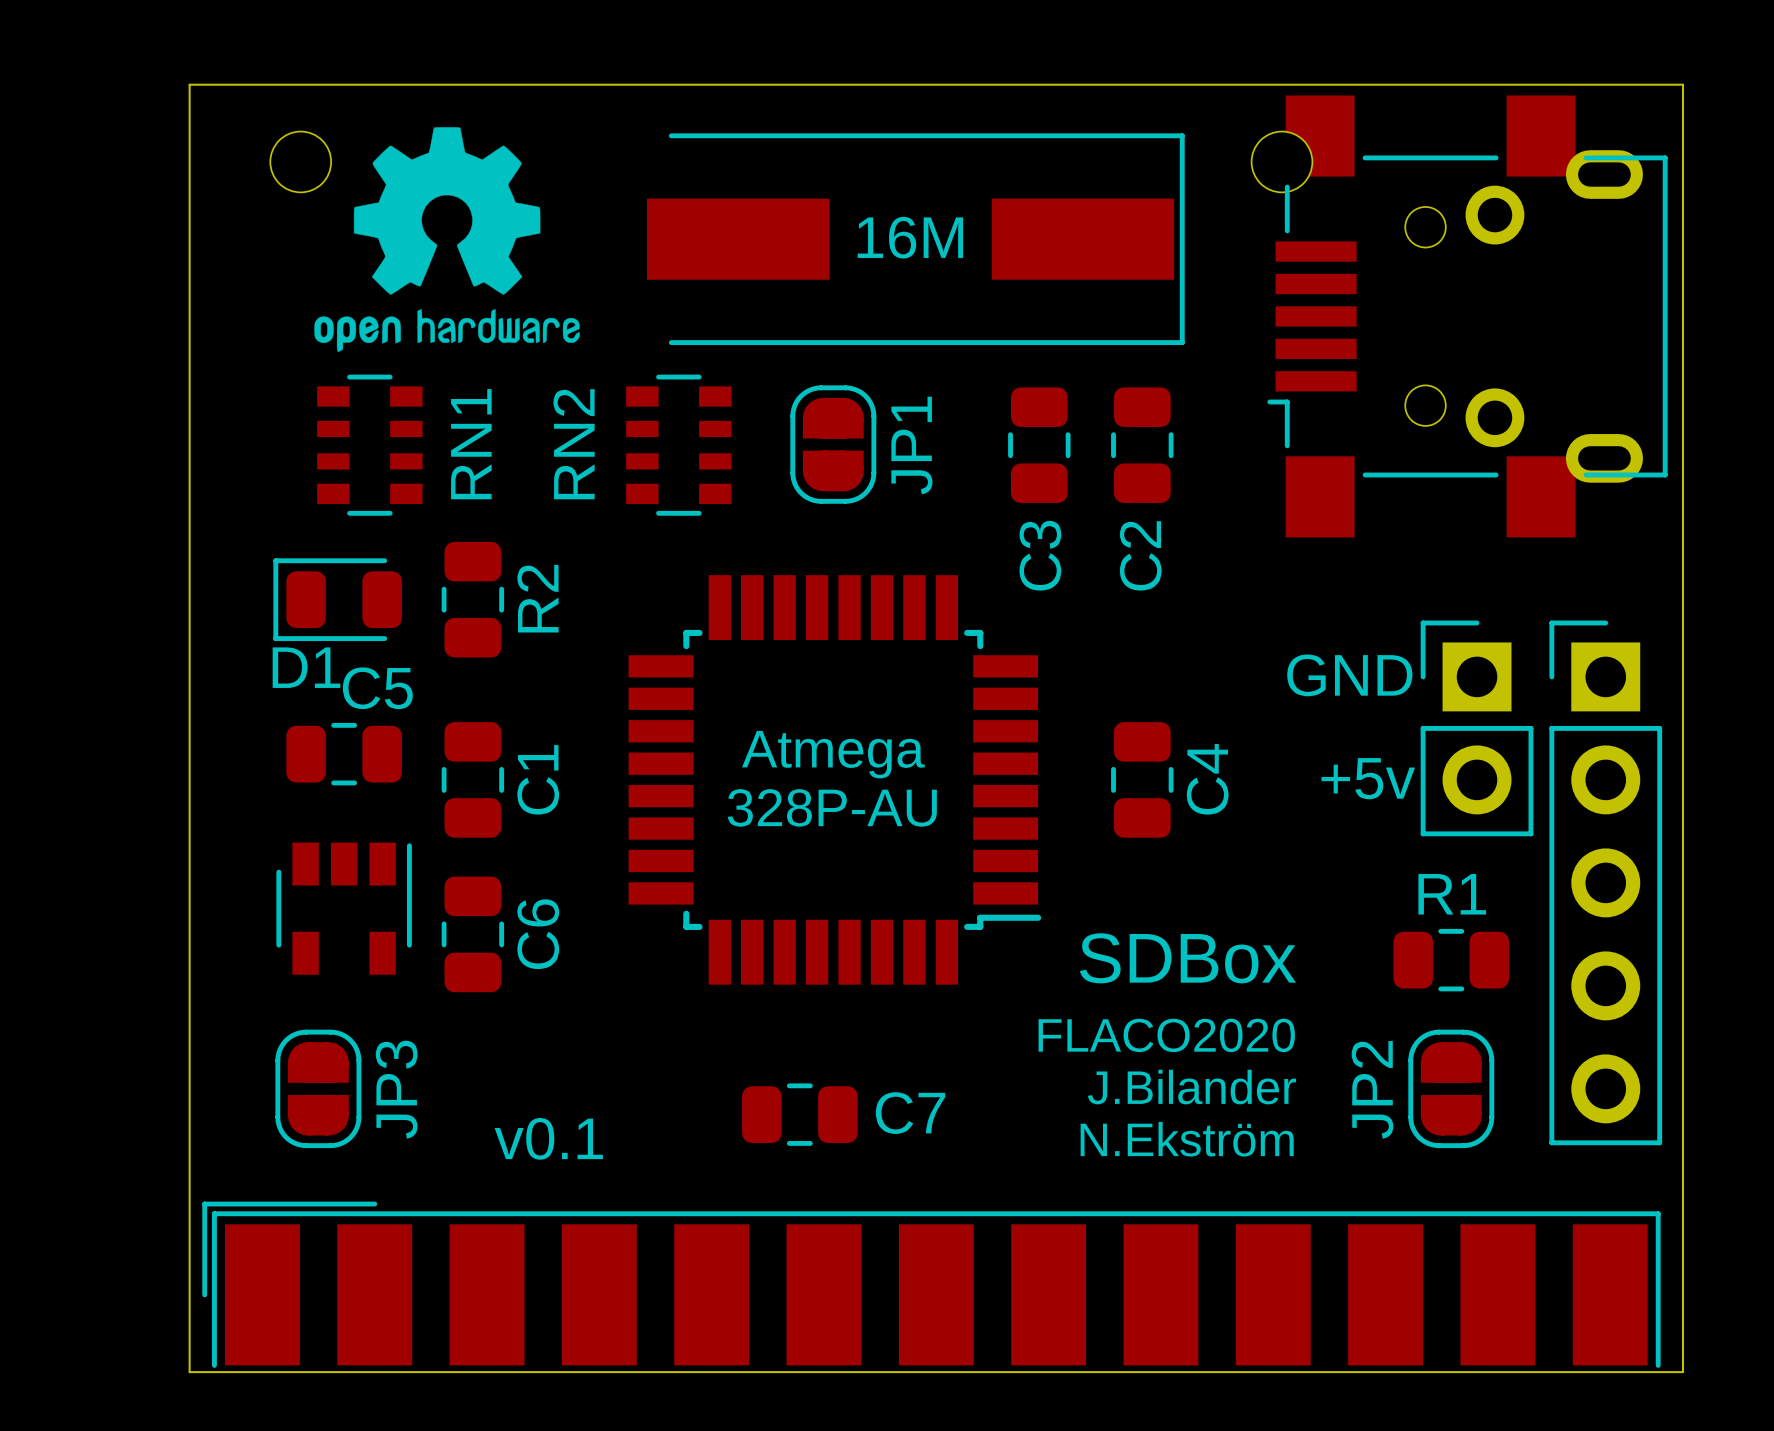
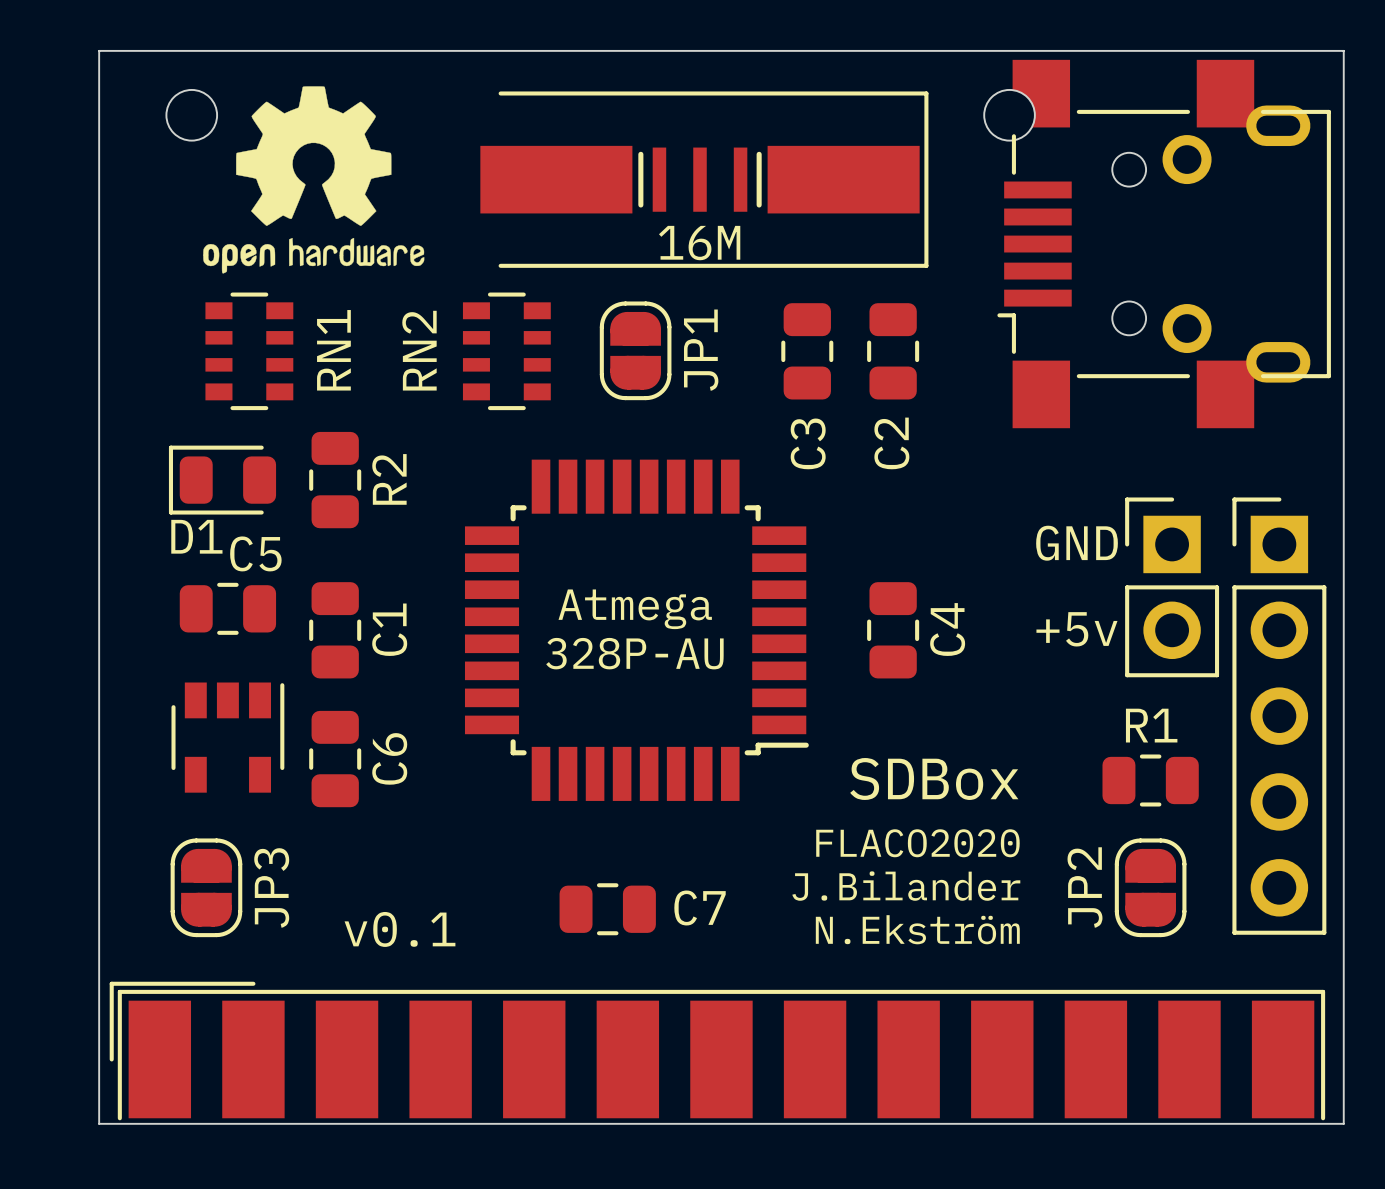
text position: 16M (910, 237) -> 16M (699, 243)
part: none -> (700, 179)

